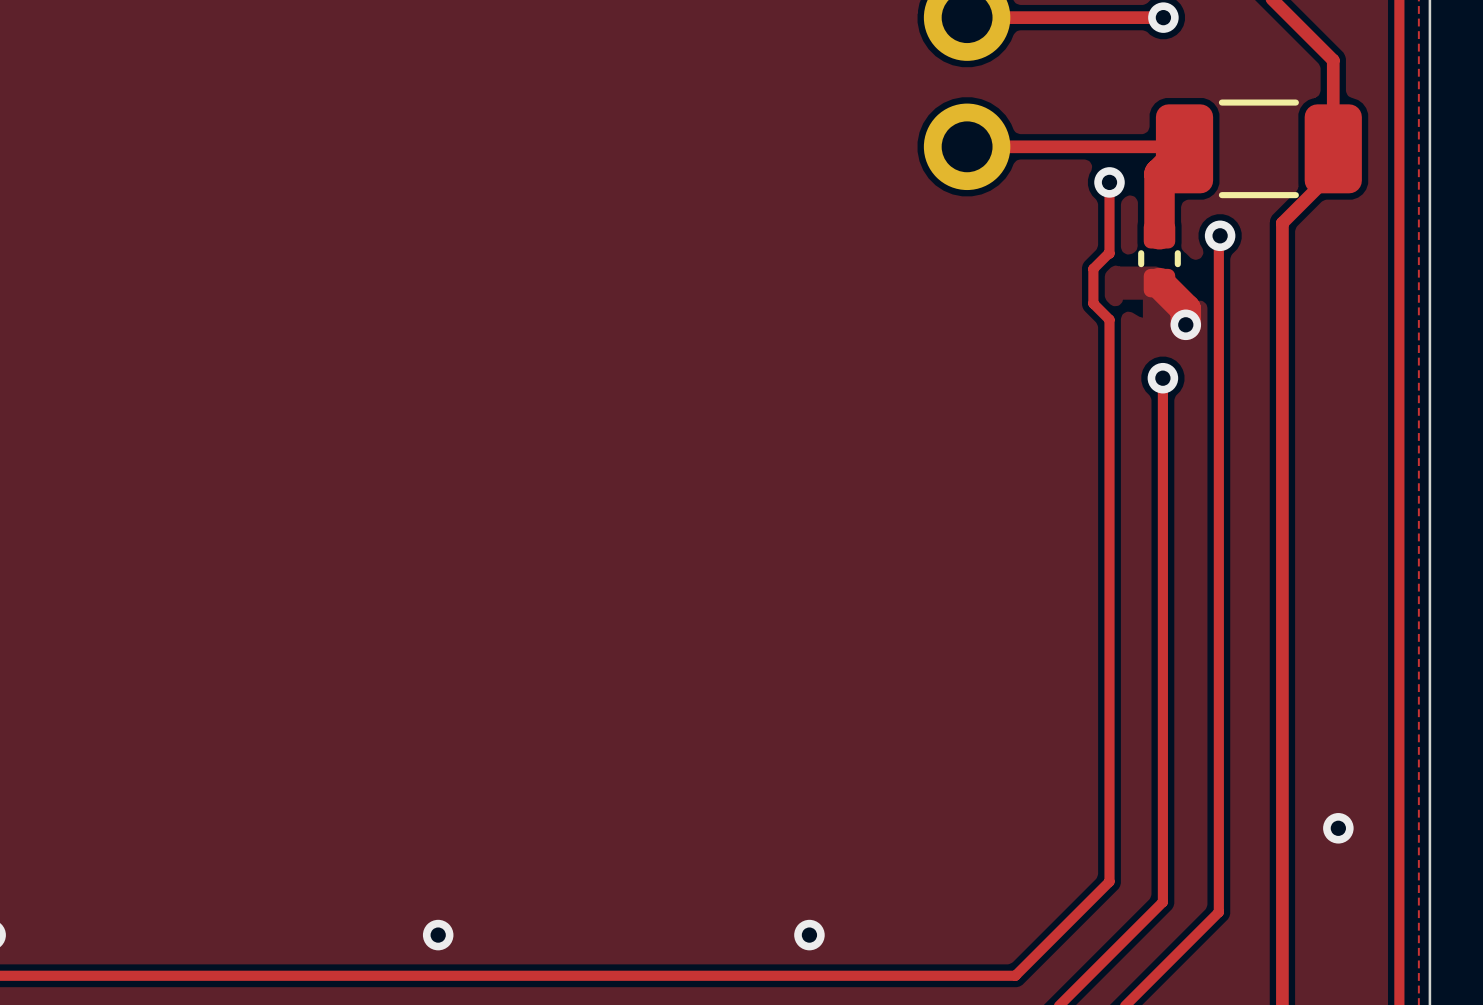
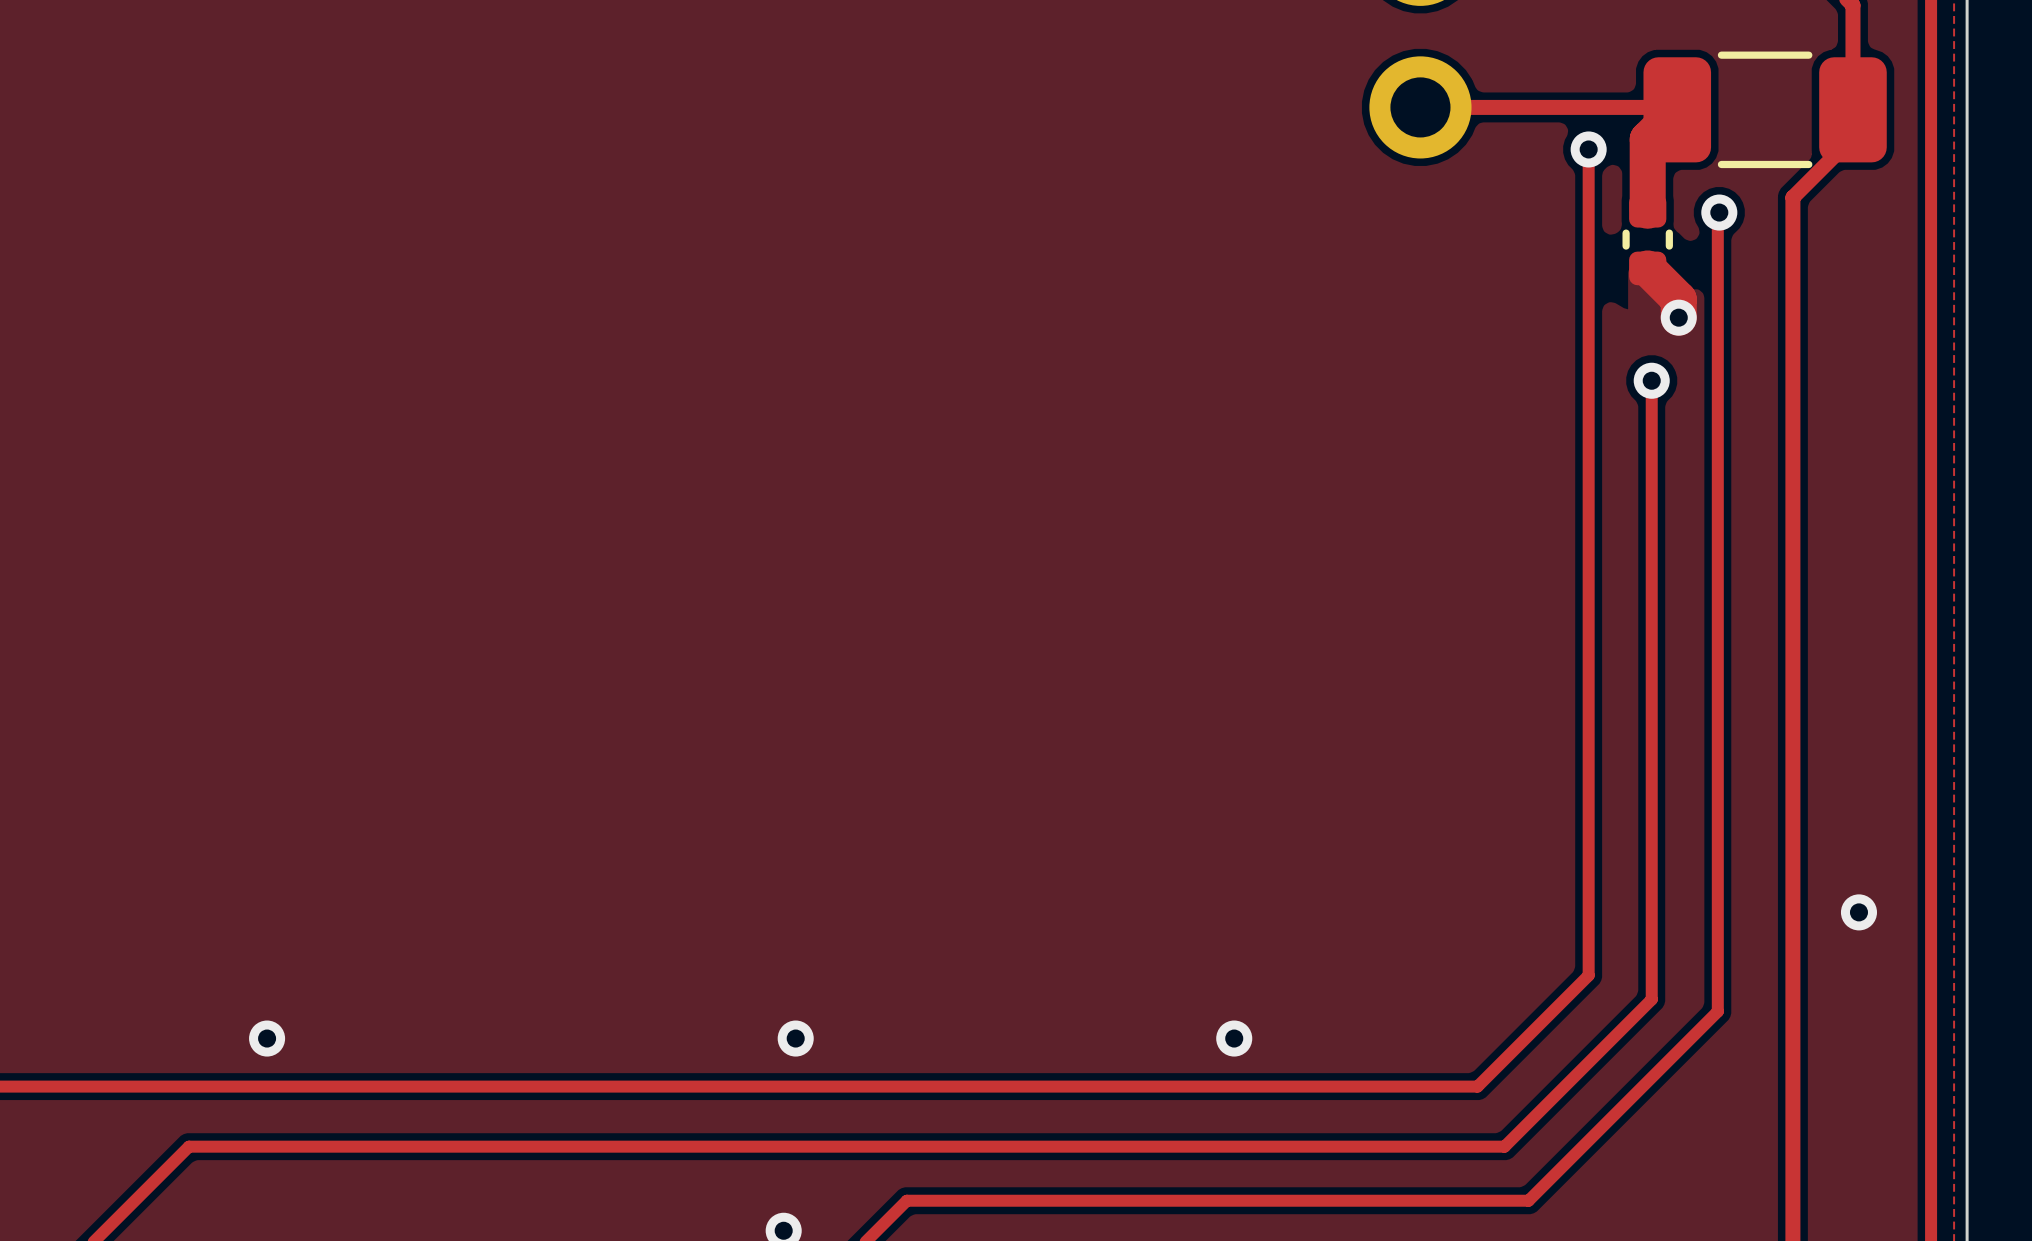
track: (1108, 253) (1093, 268) (1093, 303) (1109, 319) -> (1588, 233) (1588, 311)

